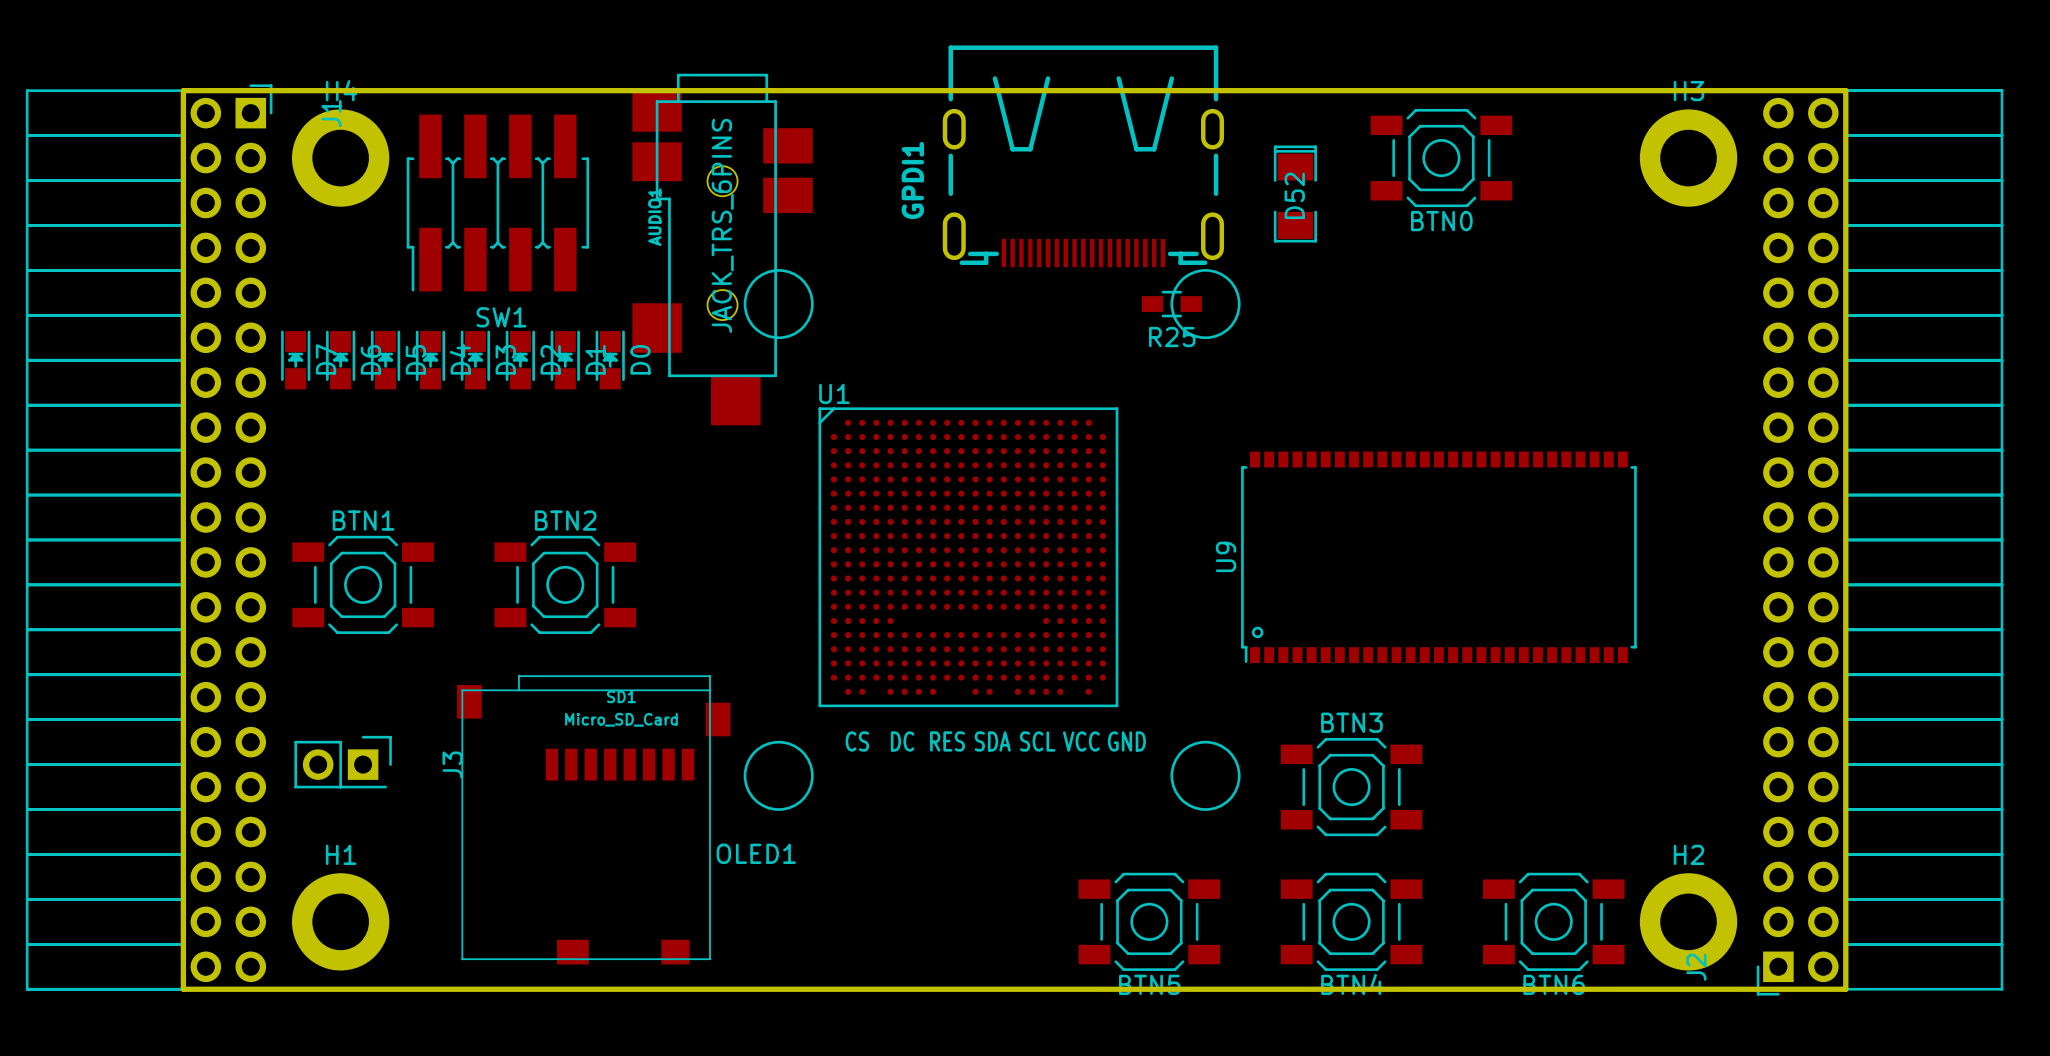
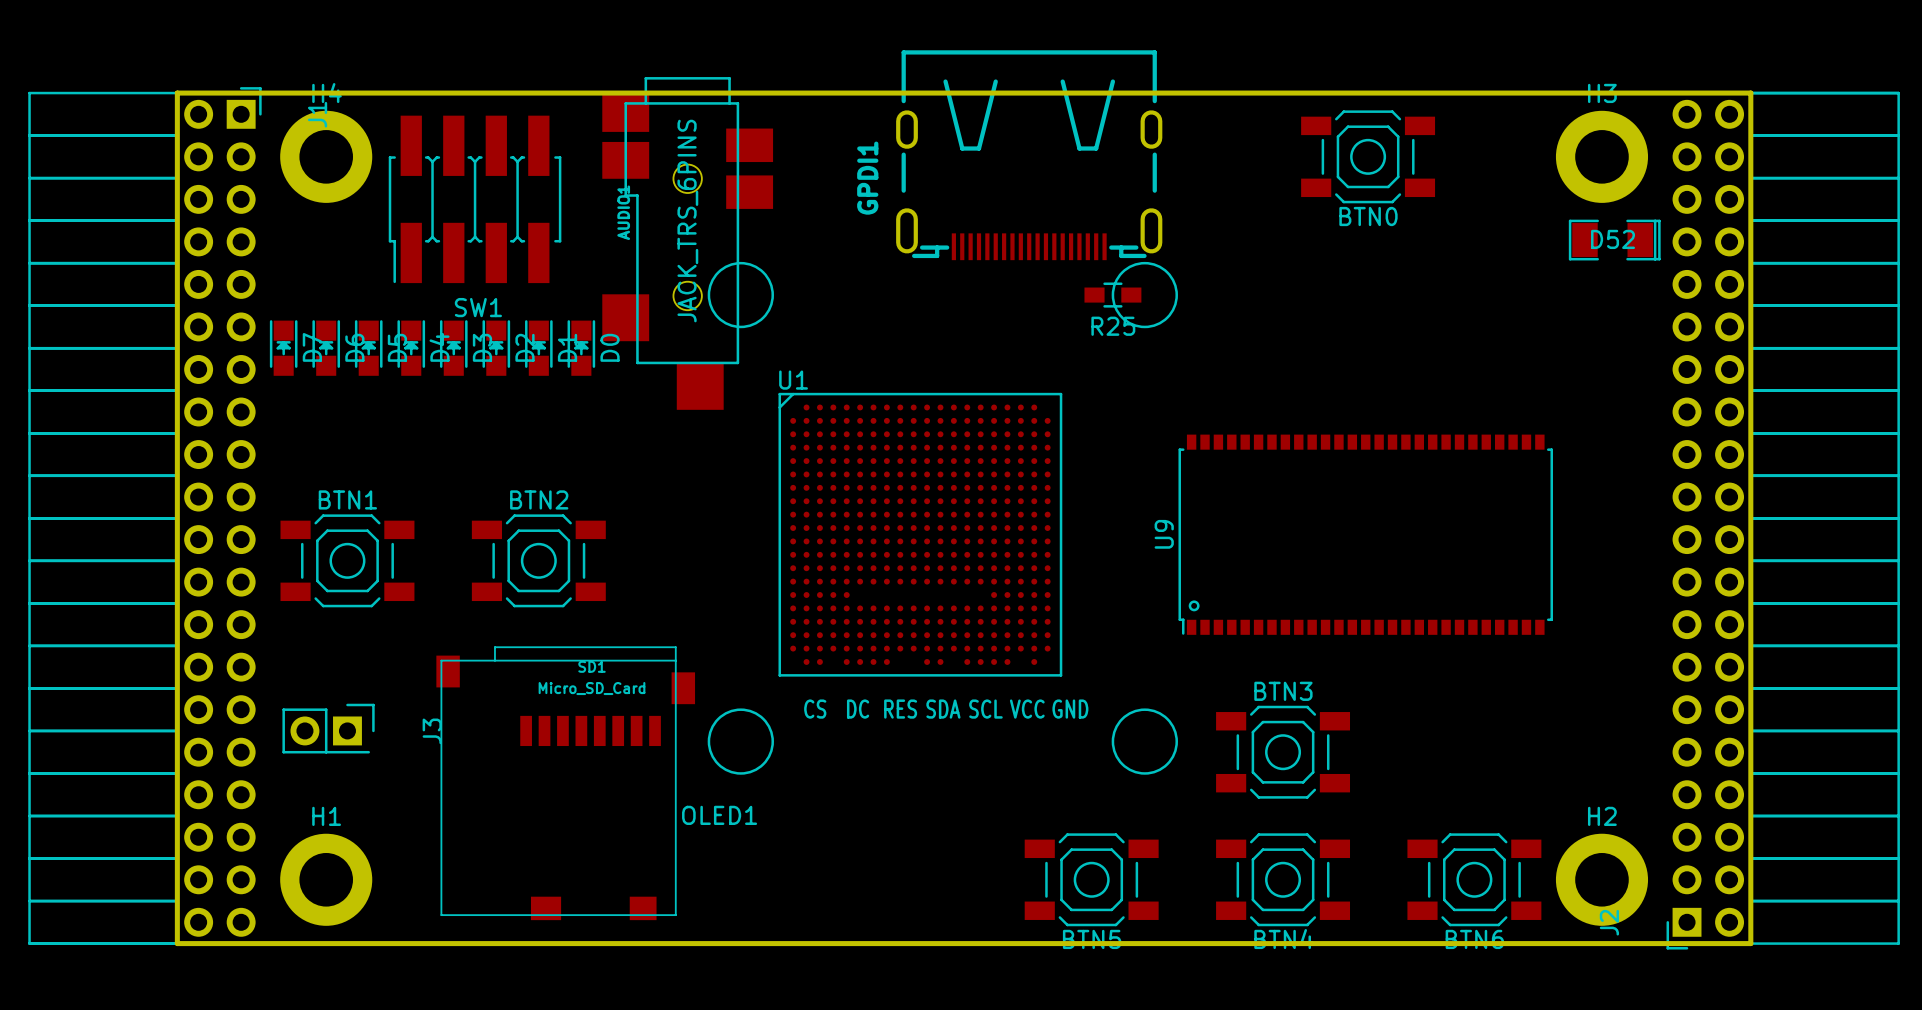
D52 rotation: 0° (1295, 194) -> 90° clockwise (1614, 240)
D52 position: (1295, 194) -> (1614, 240)

